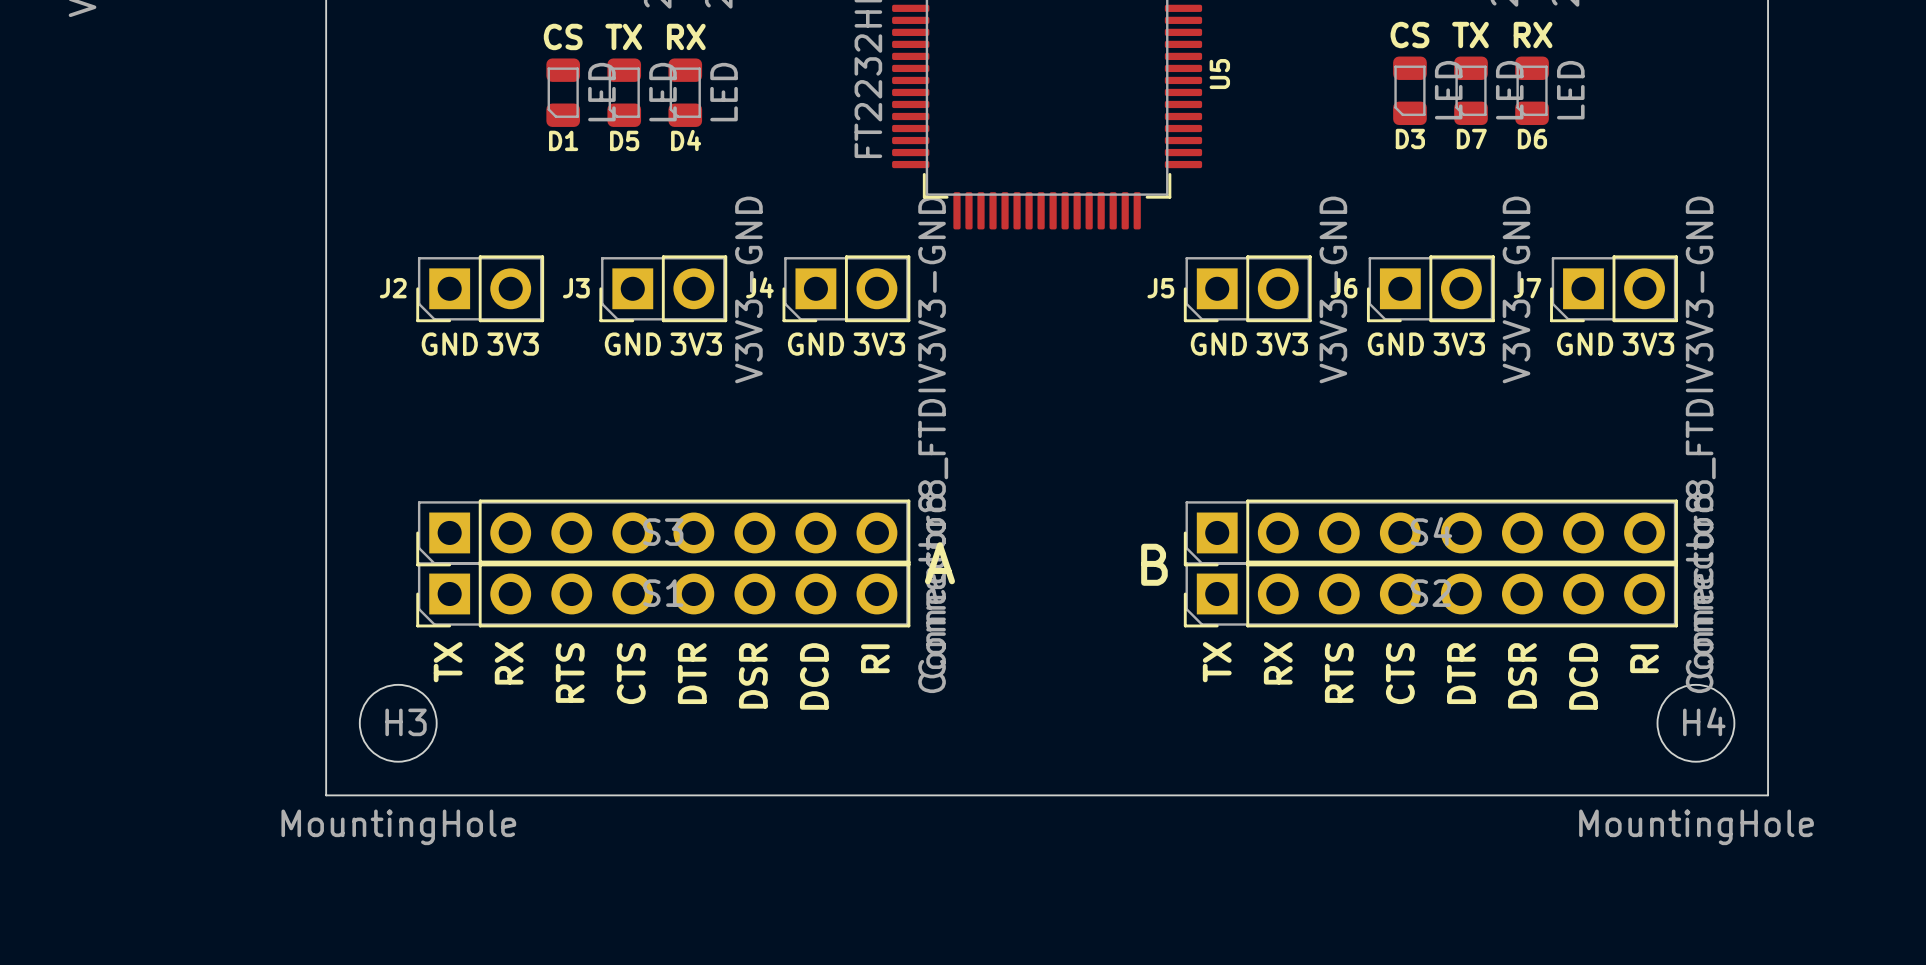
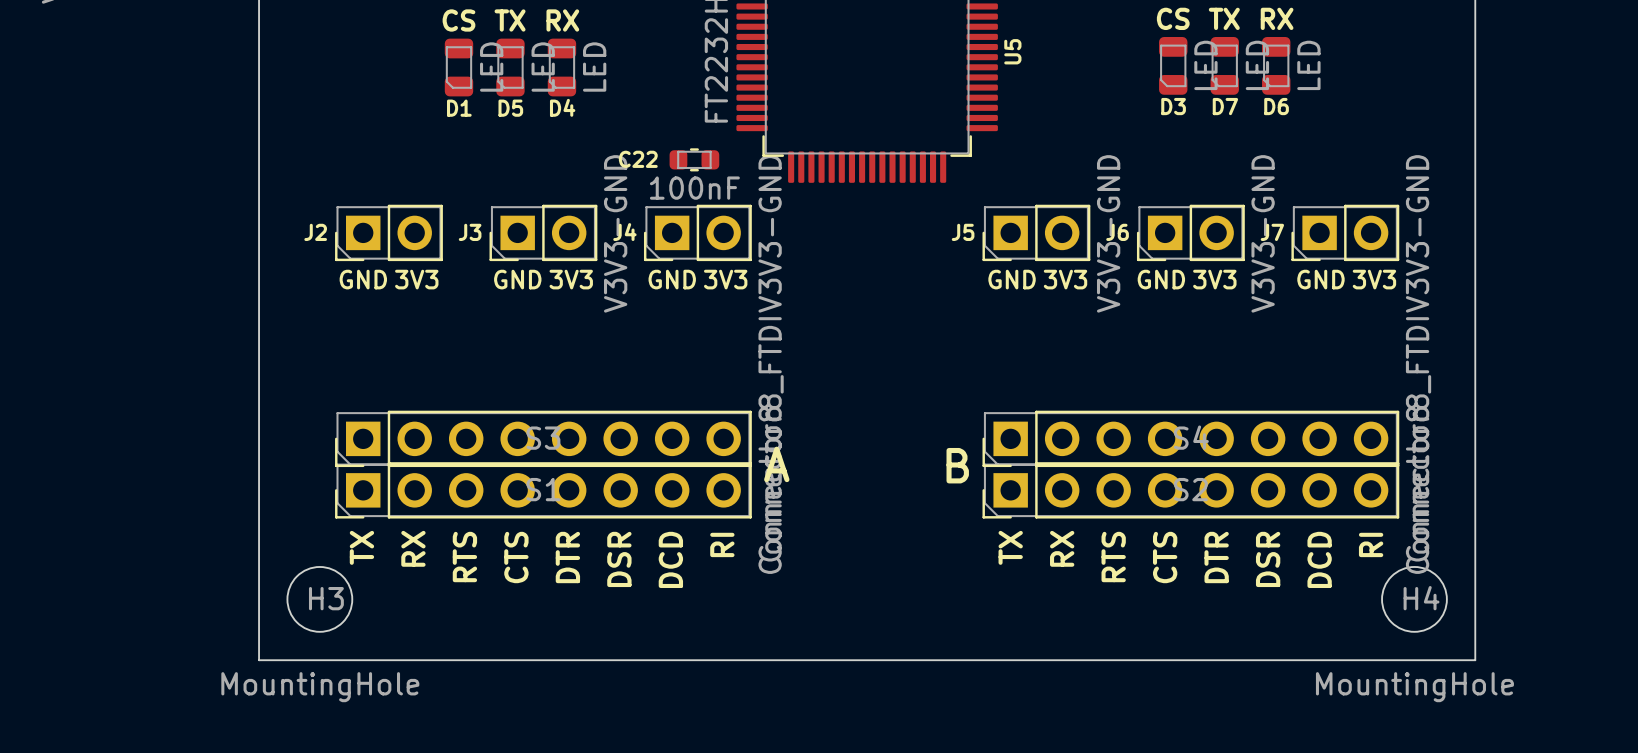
C22: none -> 100nF (694, 159)

